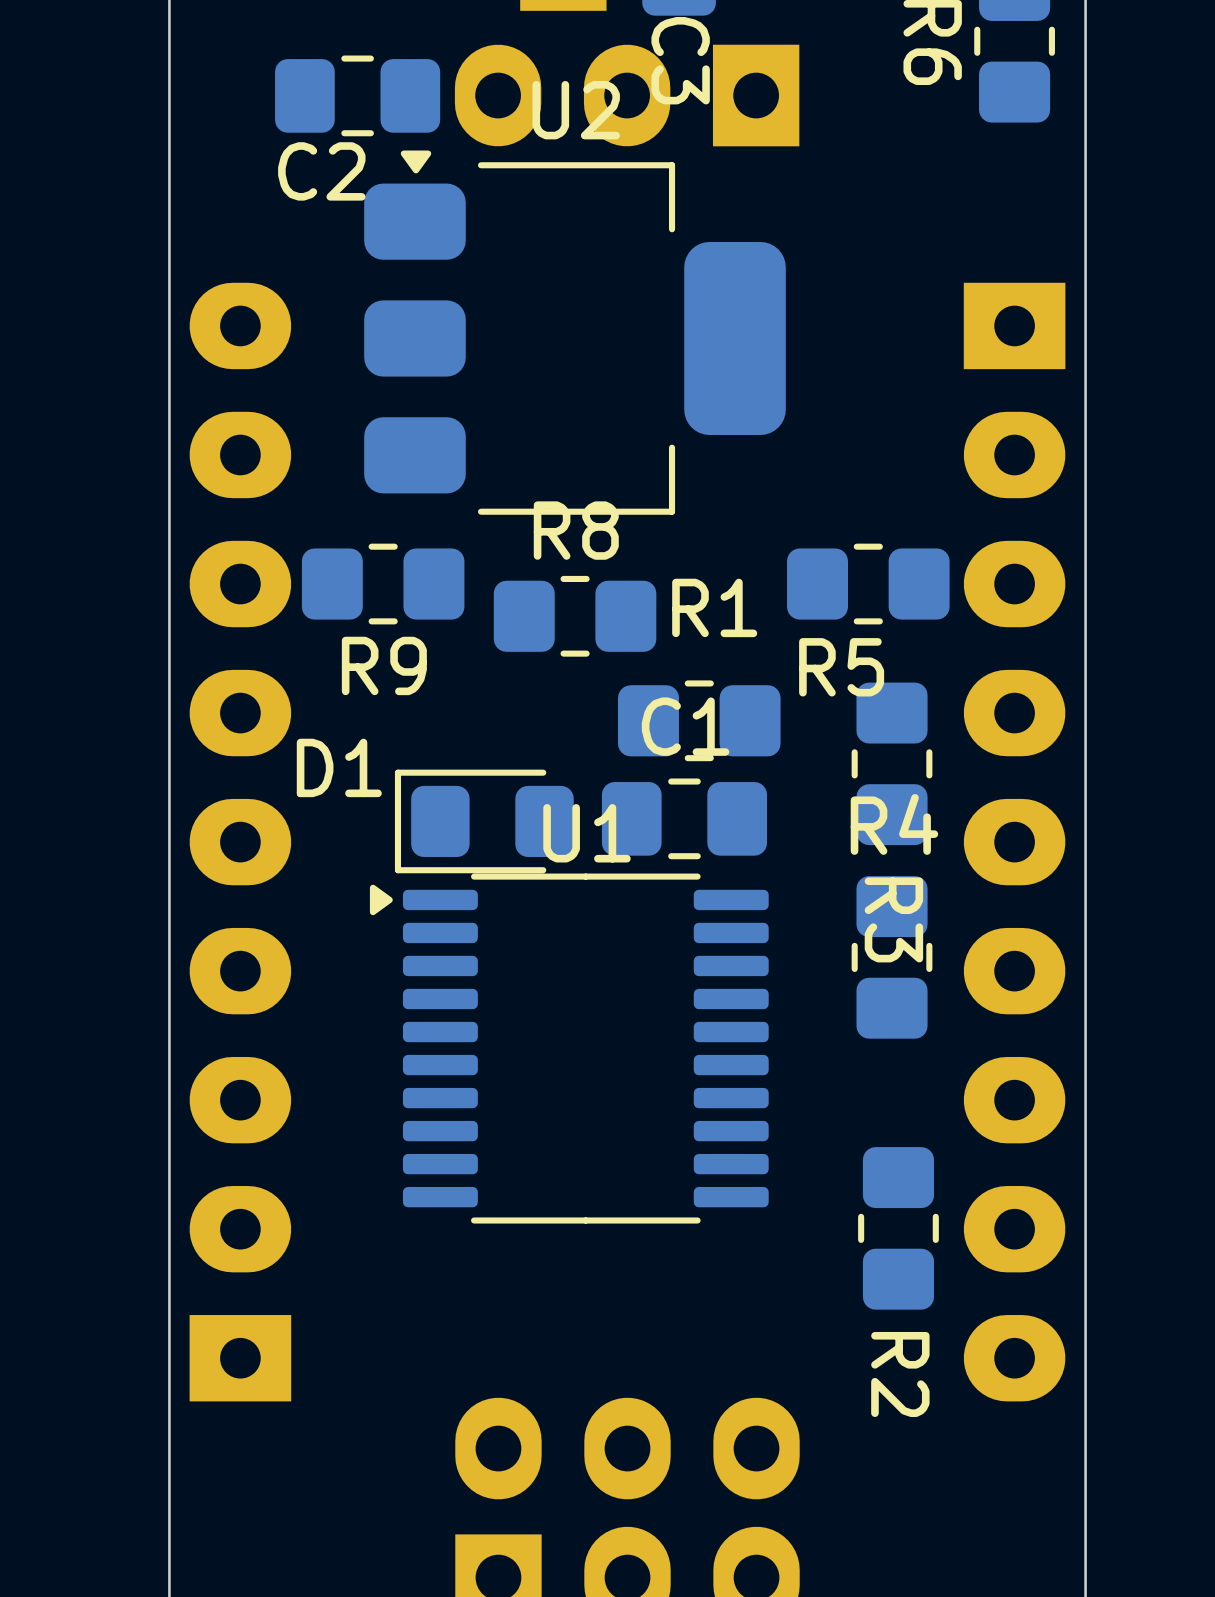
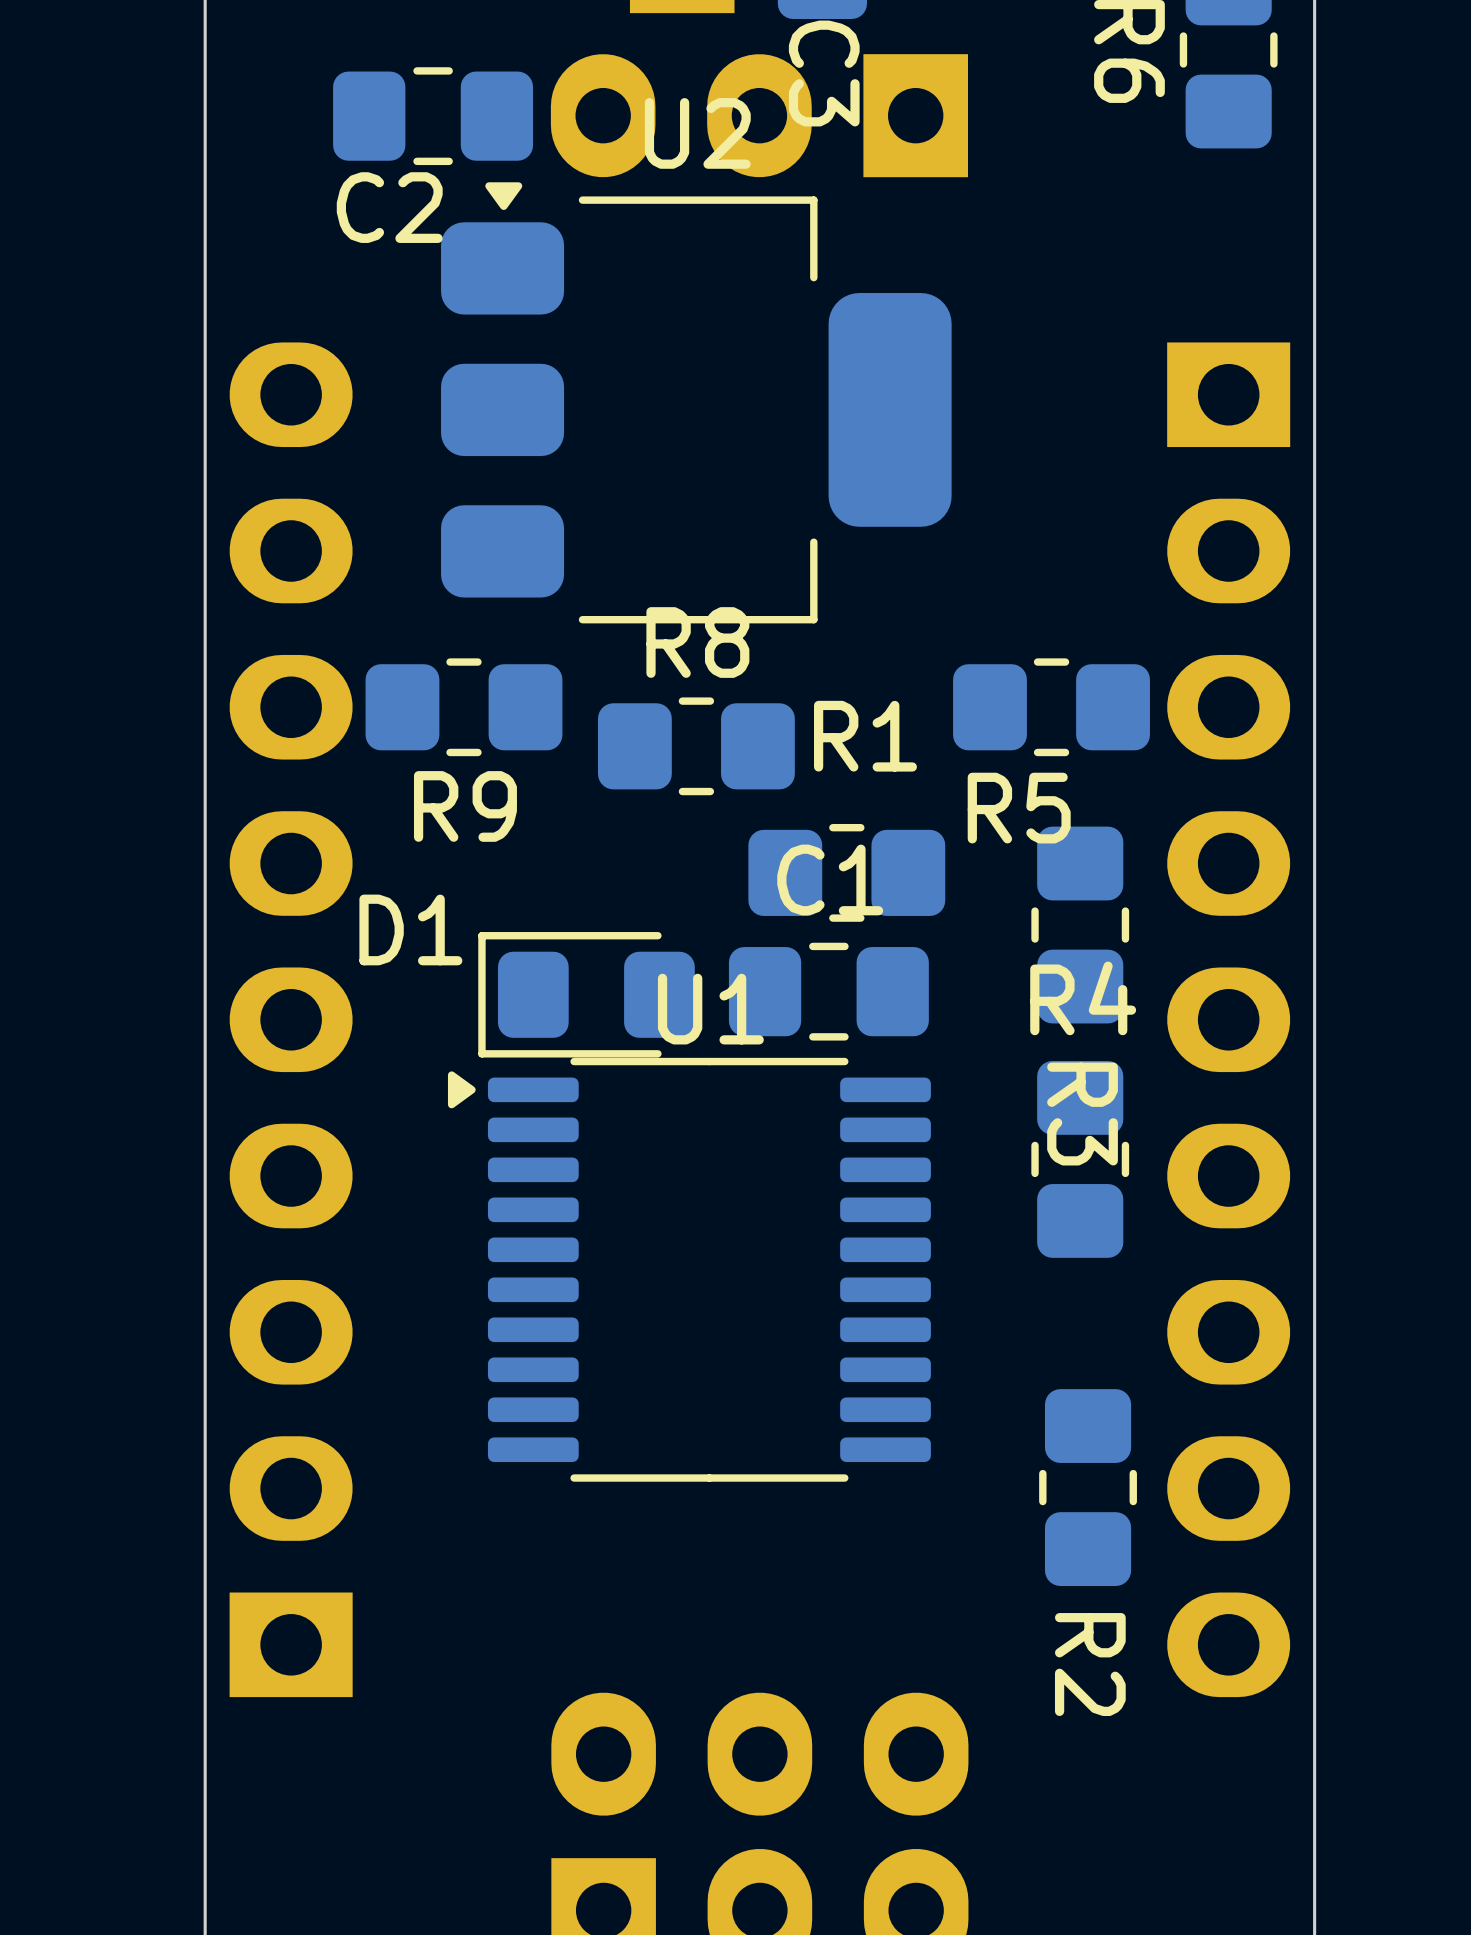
part footprint: [189, 282, 292, 1402] -> [229, 342, 353, 1698]
part footprint: [963, 282, 1066, 1402] -> [1167, 342, 1291, 1698]

